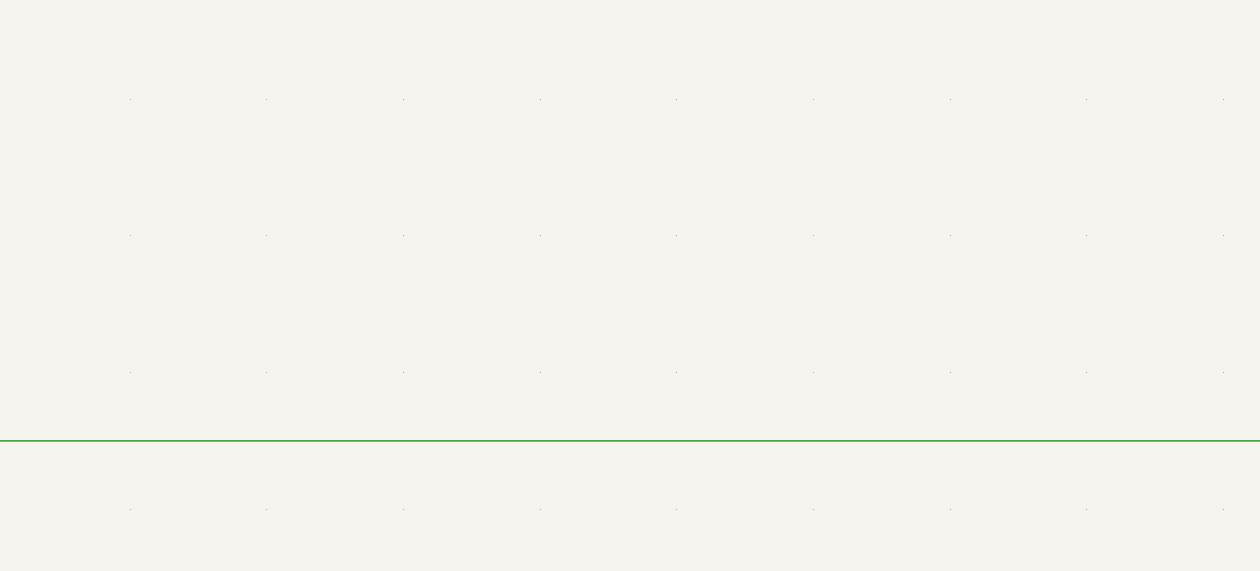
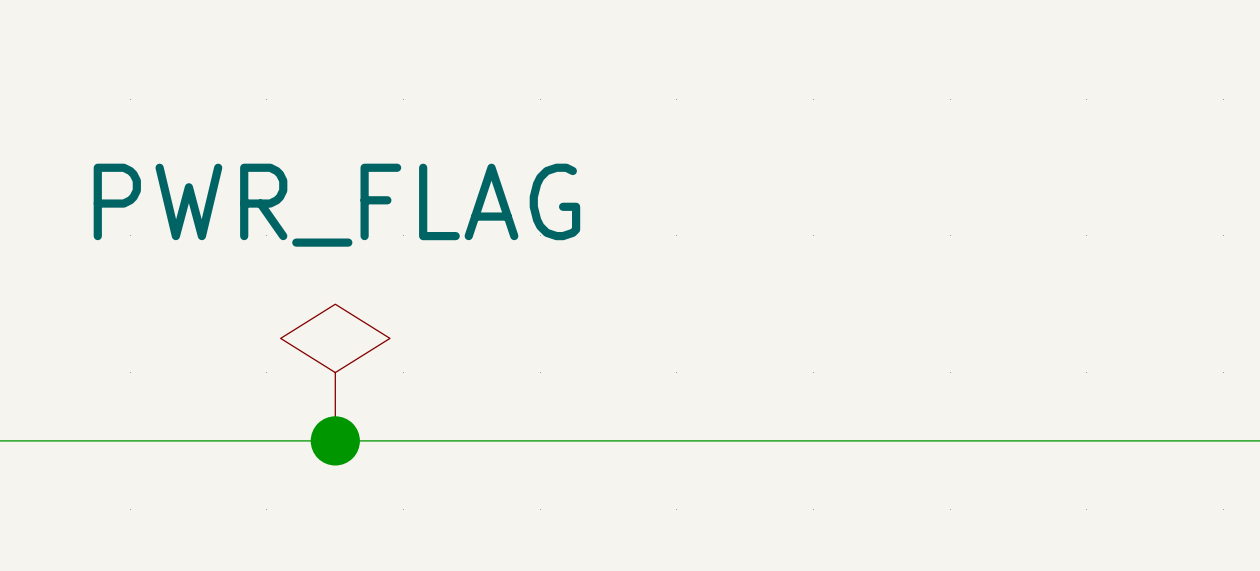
power symbol: none -> PWR_FLAG (335, 372)
junction: none -> (335, 440)

